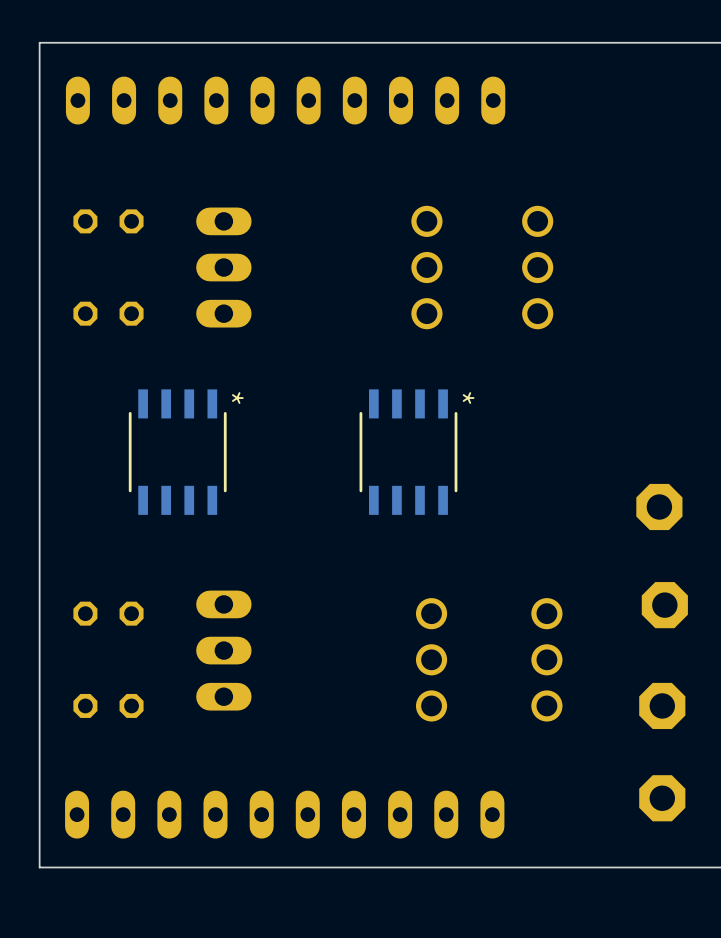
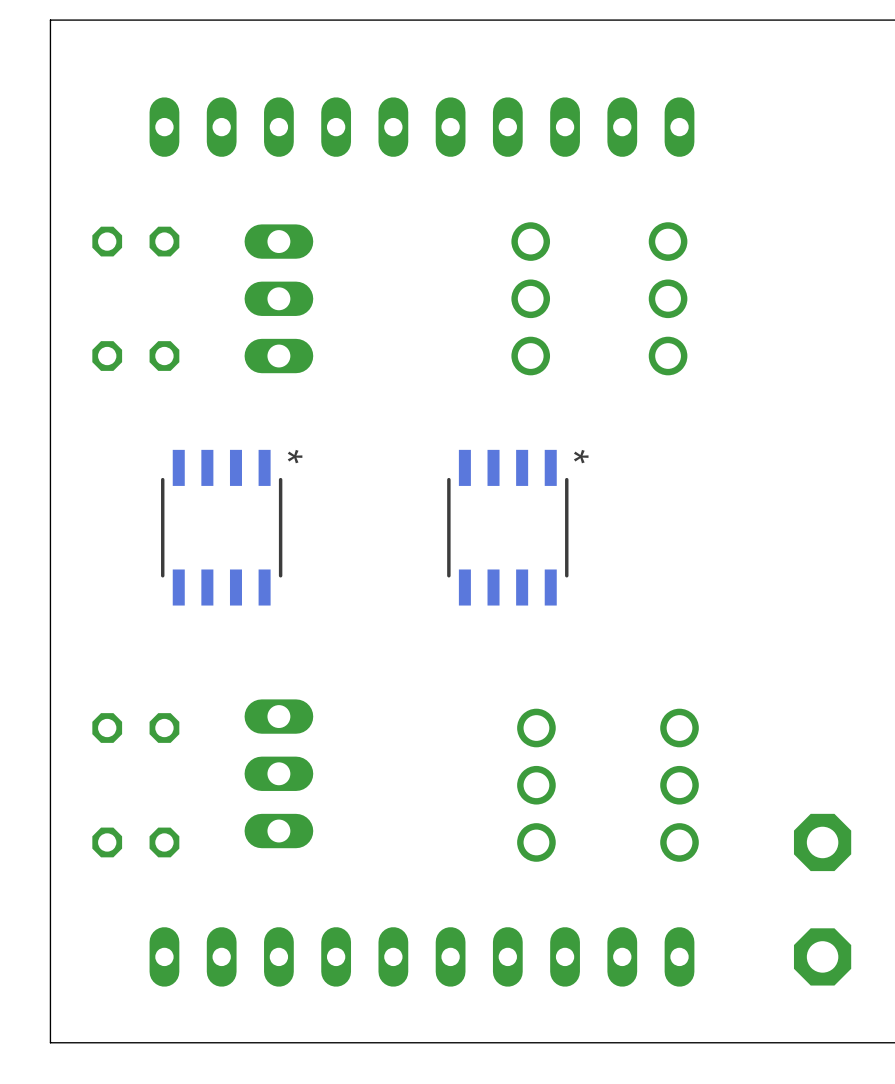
part position: (285, 100) -> (421, 127)
part: (659, 507) -> none
part: (664, 605) -> none
part position: (284, 814) -> (421, 956)

